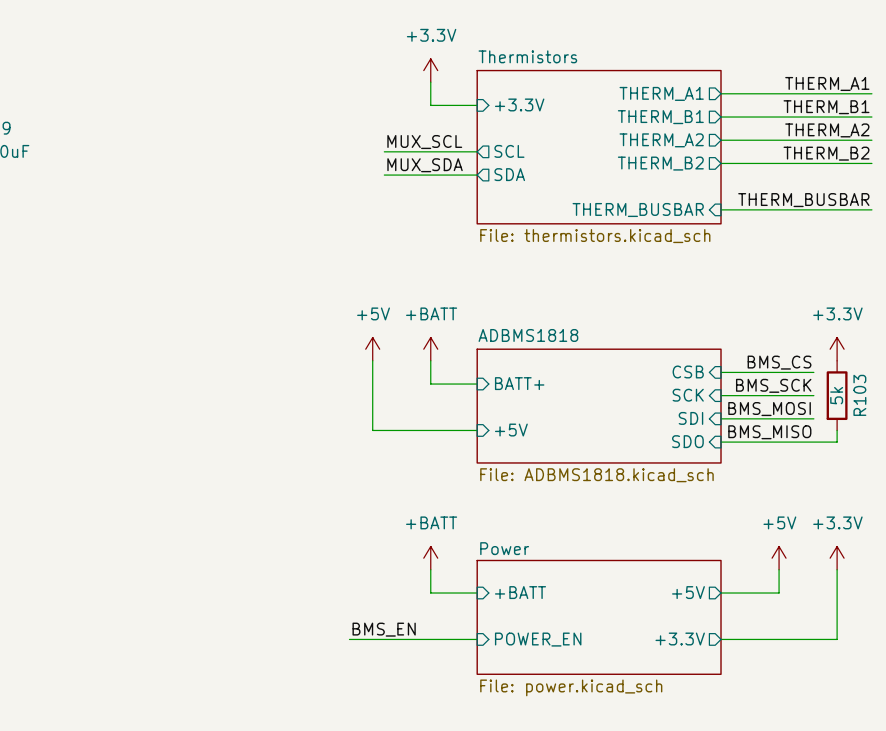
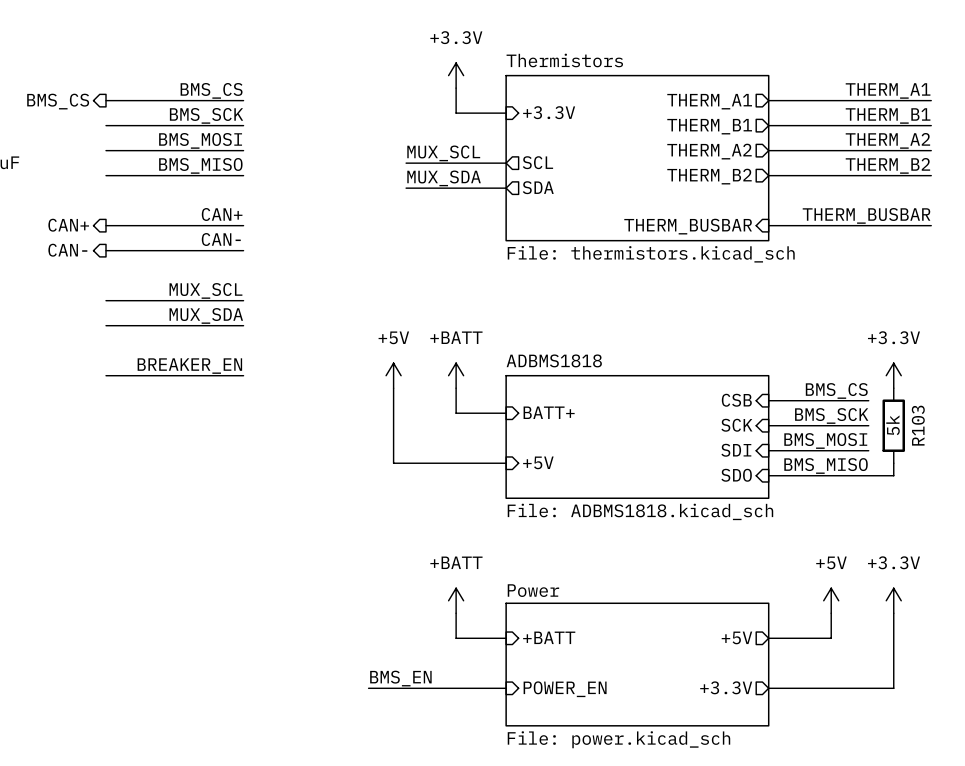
label: none -> BMS_CS (211, 90)
sheet pin: none -> BMS_CS (58, 101)
wire: none -> (106, 100) (243, 100)
label: none -> BMS_SCK (206, 115)
wire: none -> (106, 125) (243, 125)
label: none -> BMS_MOSI (200, 140)
wire: none -> (106, 150) (243, 150)
label: none -> BMS_MISO (200, 165)
wire: none -> (106, 175) (243, 175)
label: none -> CAN+ (222, 214)
sheet pin: none -> CAN+ (68, 225)
wire: none -> (106, 225) (243, 225)
label: none -> CAN- (221, 239)
sheet pin: none -> CAN- (67, 250)
wire: none -> (106, 250) (243, 250)
label: none -> MUX_SCL (205, 290)
wire: none -> (106, 300) (243, 300)
label: none -> MUX_SDA (206, 315)
wire: none -> (106, 325) (243, 325)
label: none -> BREAKER_EN (189, 366)
wire: none -> (106, 375) (243, 375)

